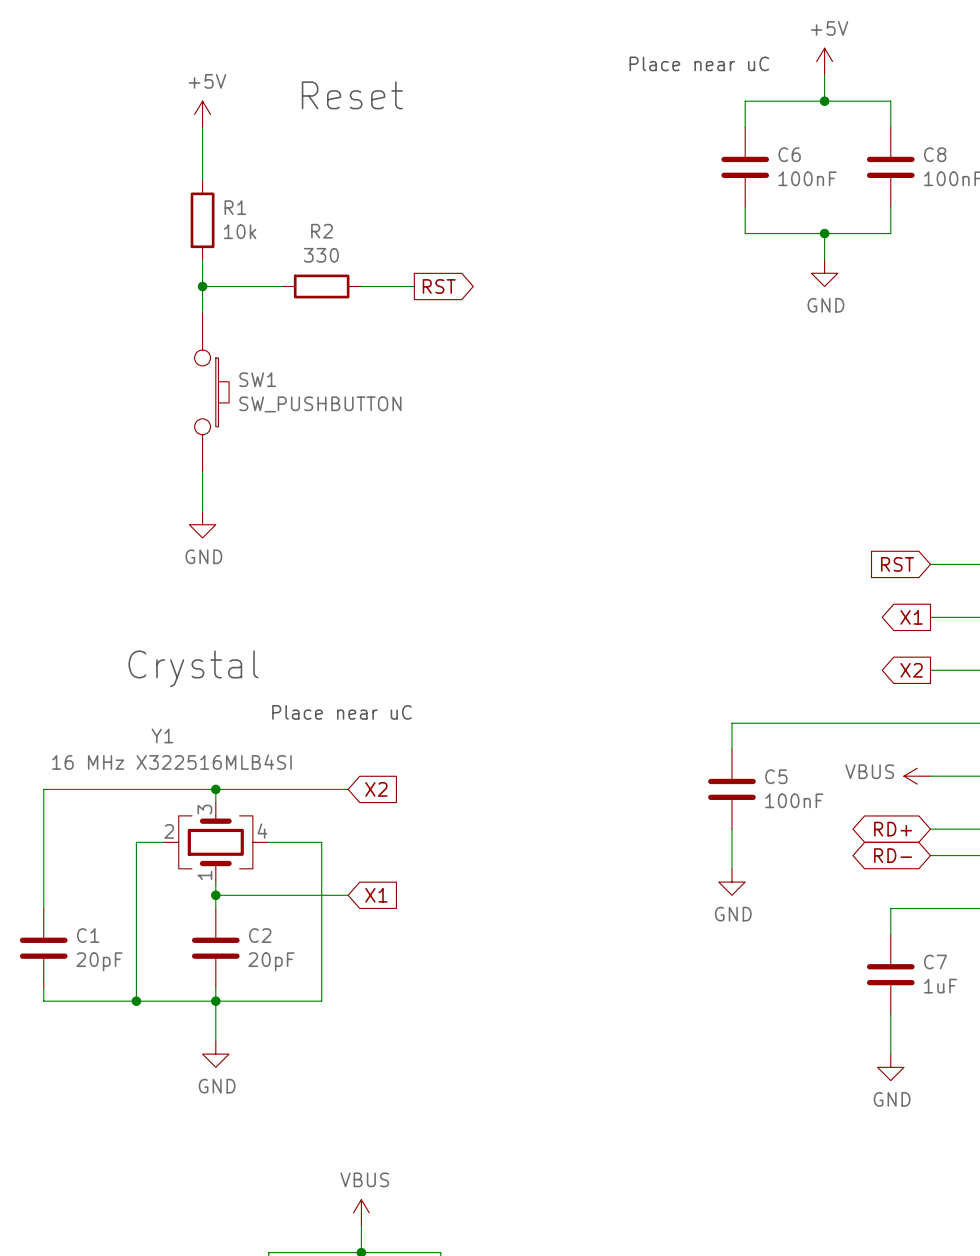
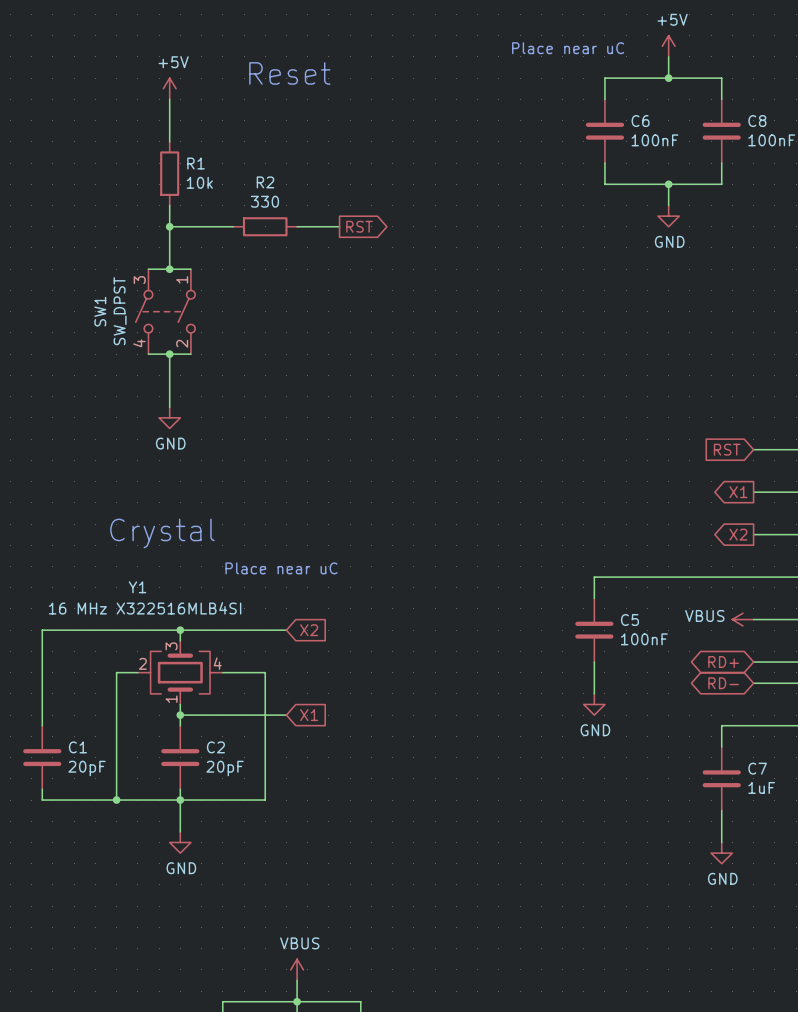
SW1 symbol: [194, 312, 230, 472] -> [135, 269, 196, 355]
wire: none -> (148, 269) (190, 269)
junction: none -> (169, 269)
SW1 name position: SW1 (257, 379) -> SW1 (100, 311)
SW1 value: SW_PUSHBUTTON (320, 404) -> SW_DPST (120, 311)
wire: none -> (148, 354) (190, 354)
junction: none -> (169, 354)

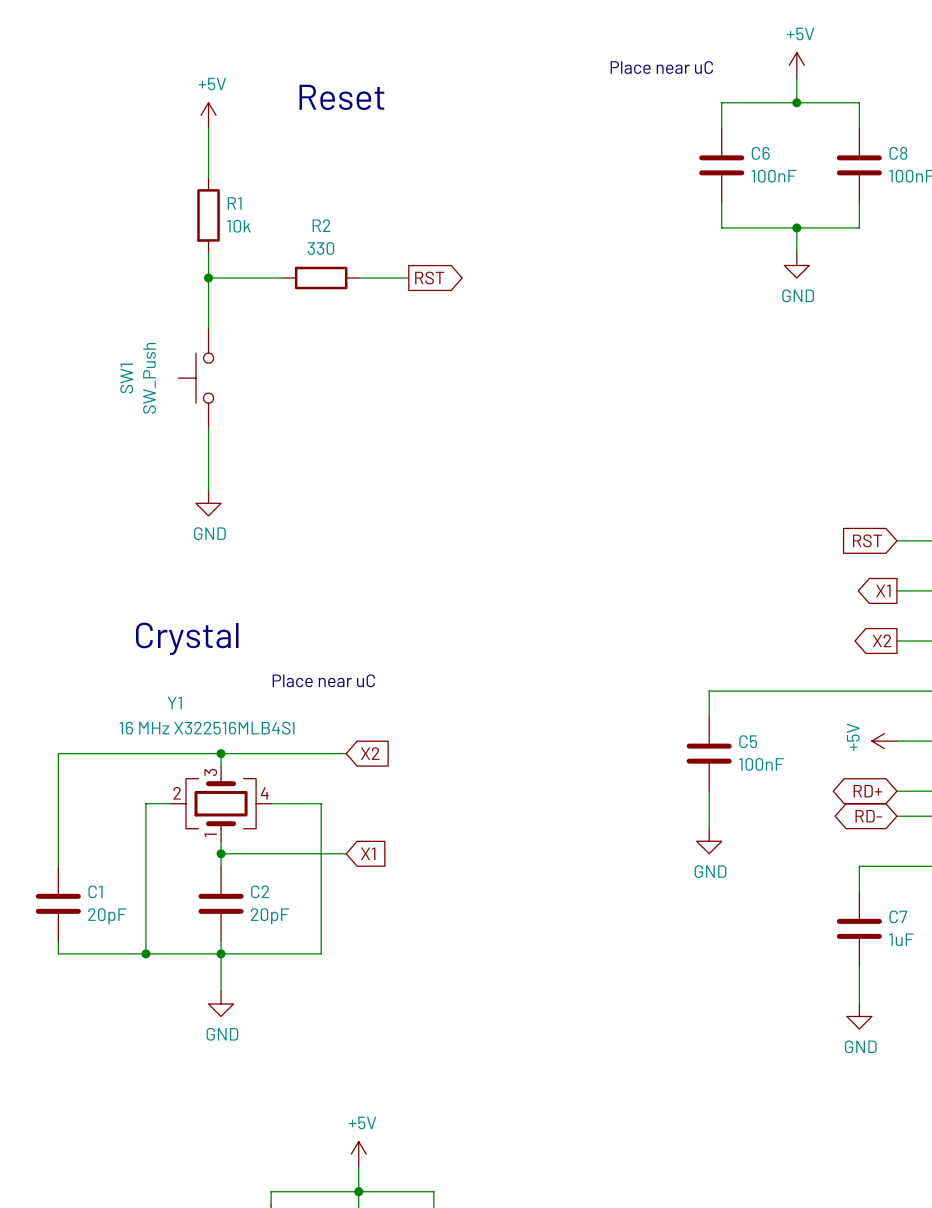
SW1 symbol: [135, 269, 196, 355] -> [178, 328, 214, 429]
wire: (148, 269) (190, 269) -> none
junction: (169, 269) -> none
SW1 value: SW_DPST (120, 311) -> SW_Push (149, 378)
wire: (148, 354) (190, 354) -> none
junction: (169, 354) -> none
power symbol: VBUS (742, 619) -> +5V (884, 741)
power symbol: VBUS (297, 969) -> +5V (358, 1154)

